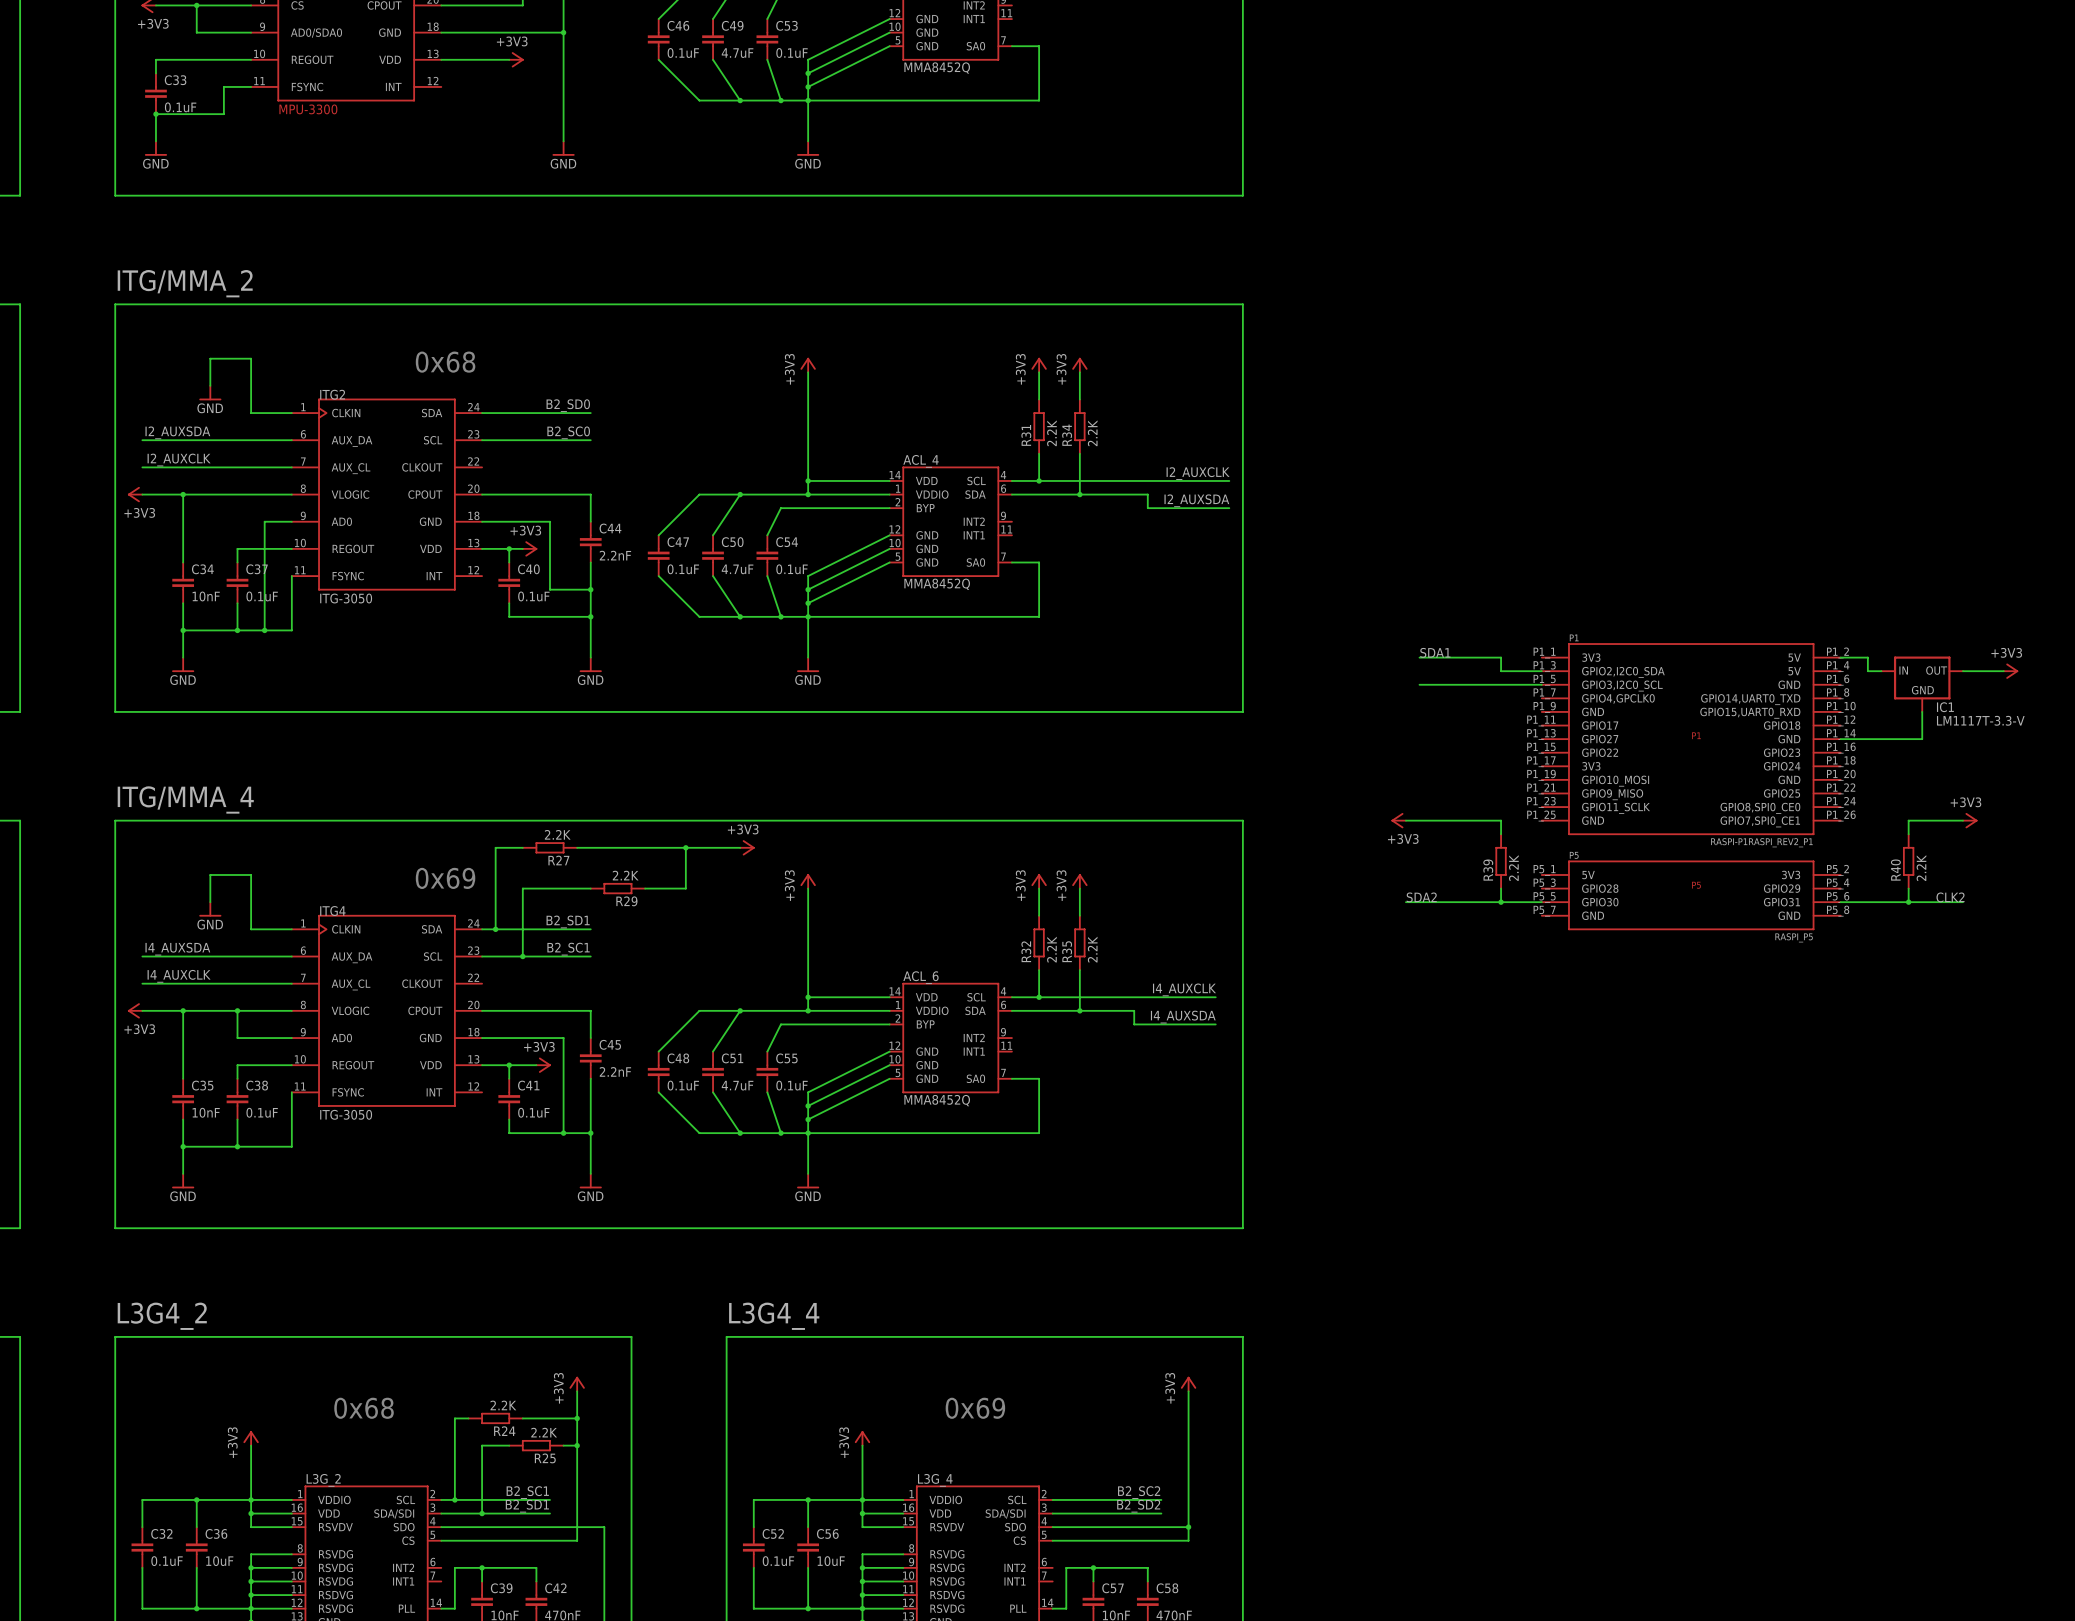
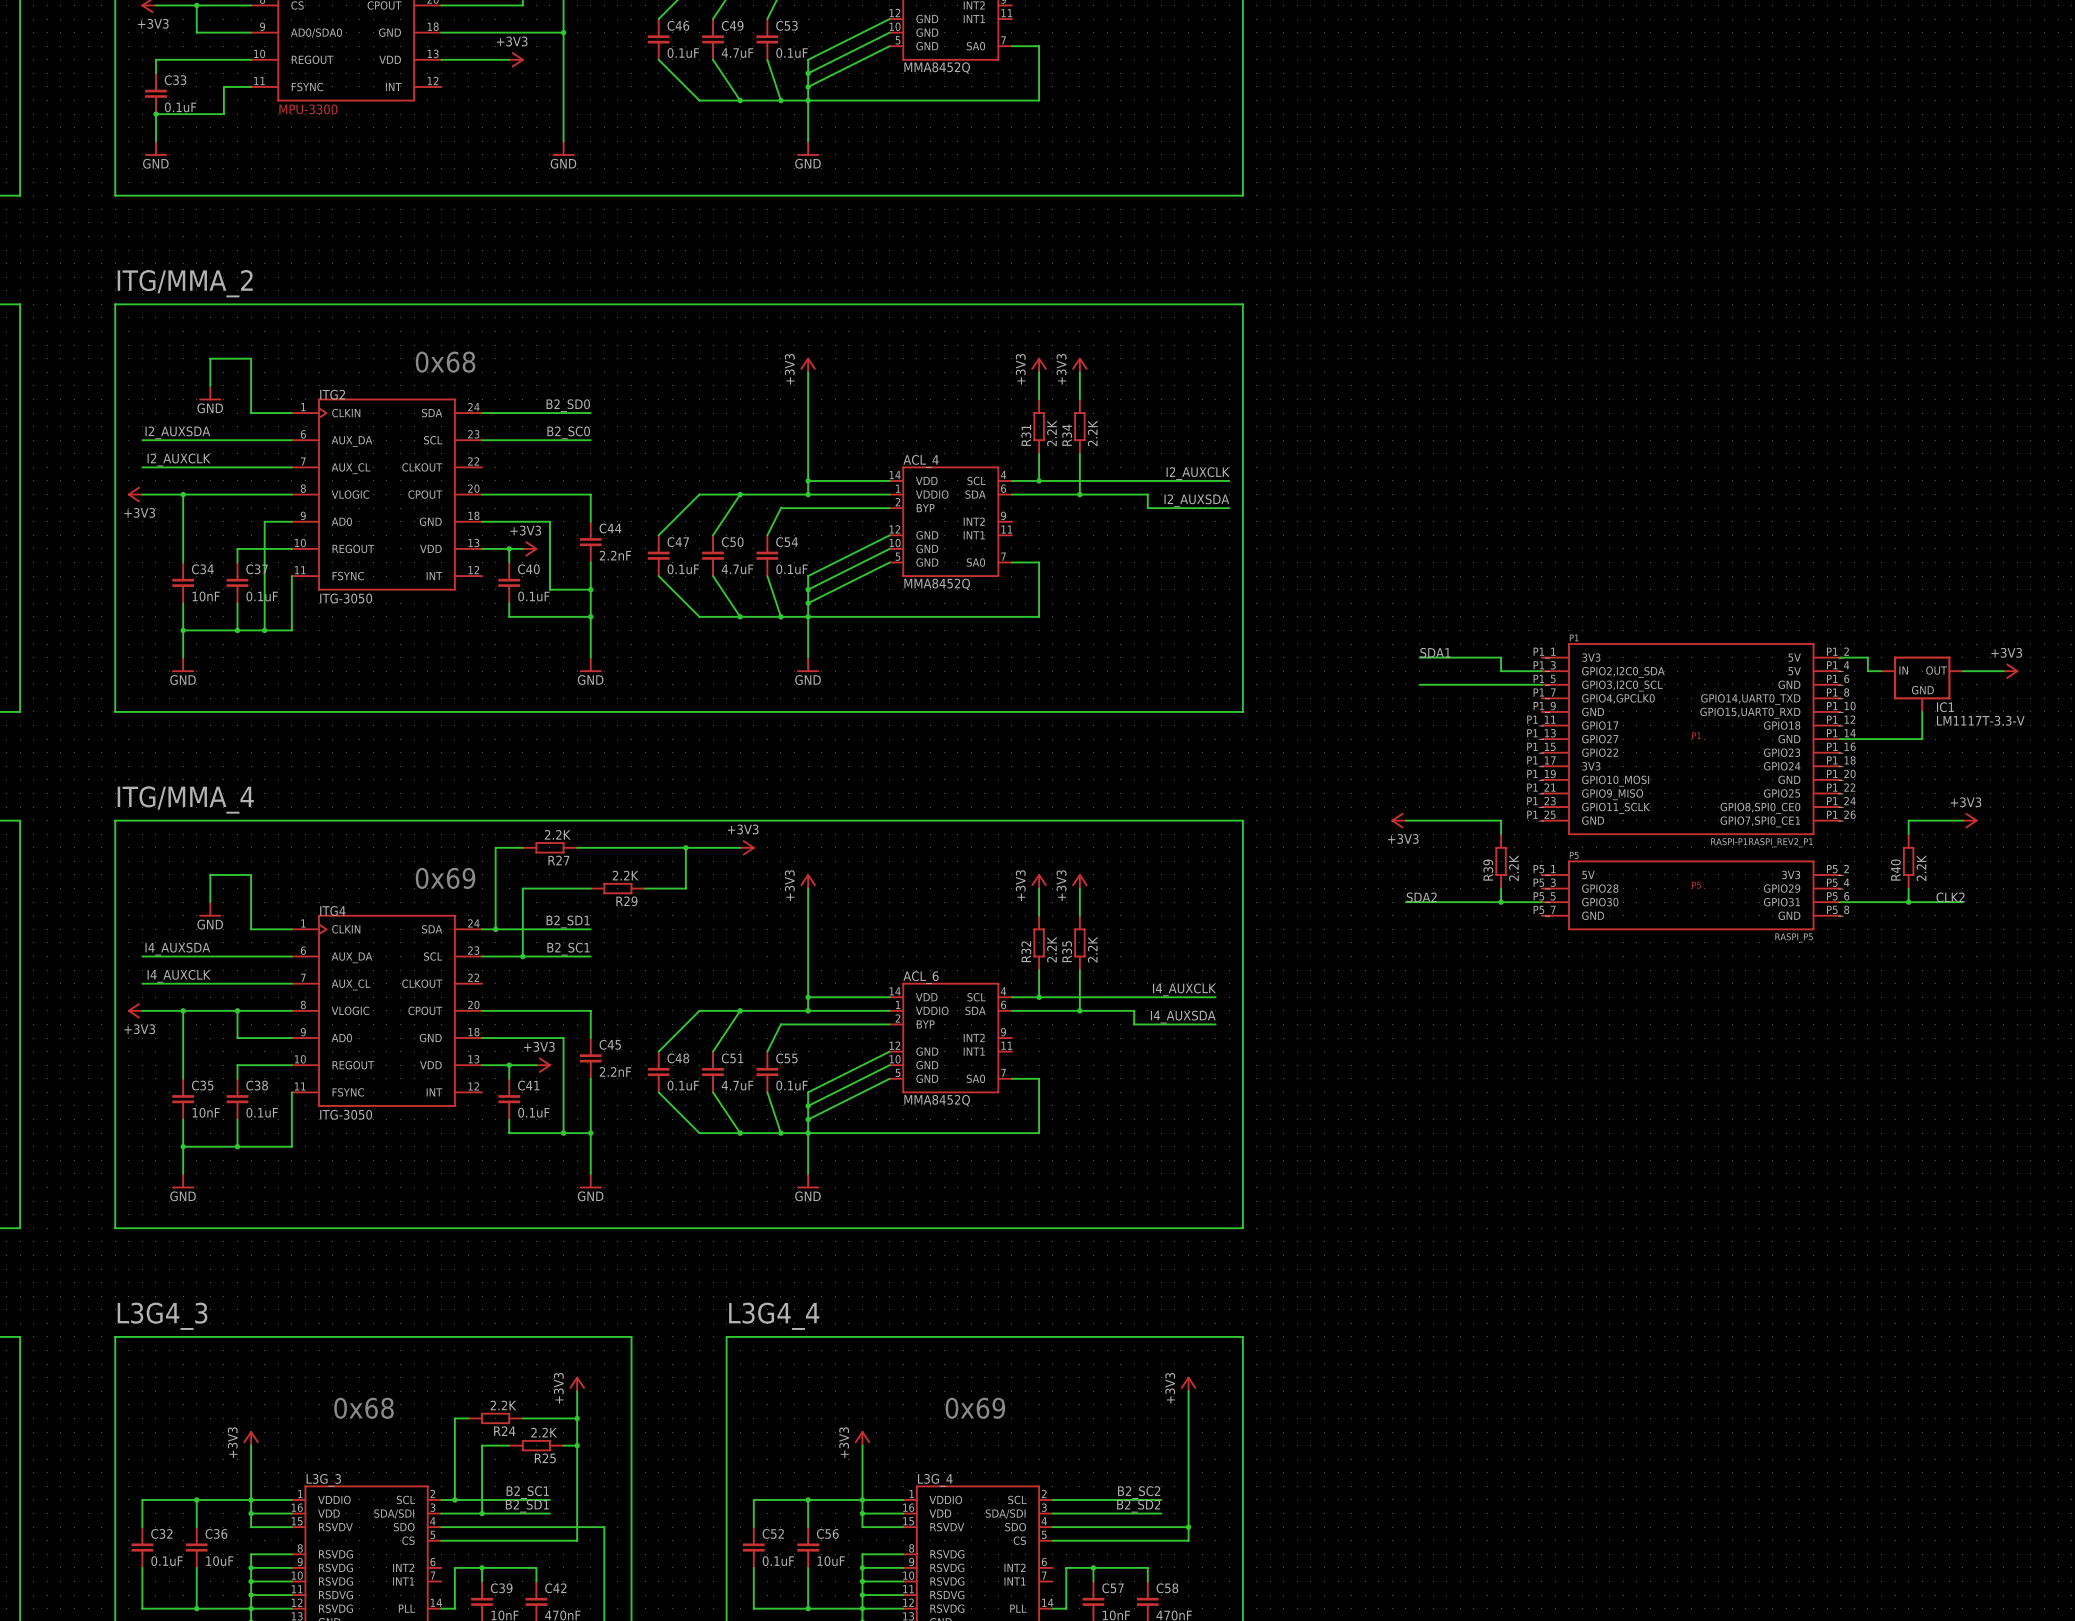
label: L3G4_2 (162, 1316) -> L3G4_3 (162, 1316)
L3G_2 name: L3G_2 (323, 1480) -> L3G_3 (323, 1480)

